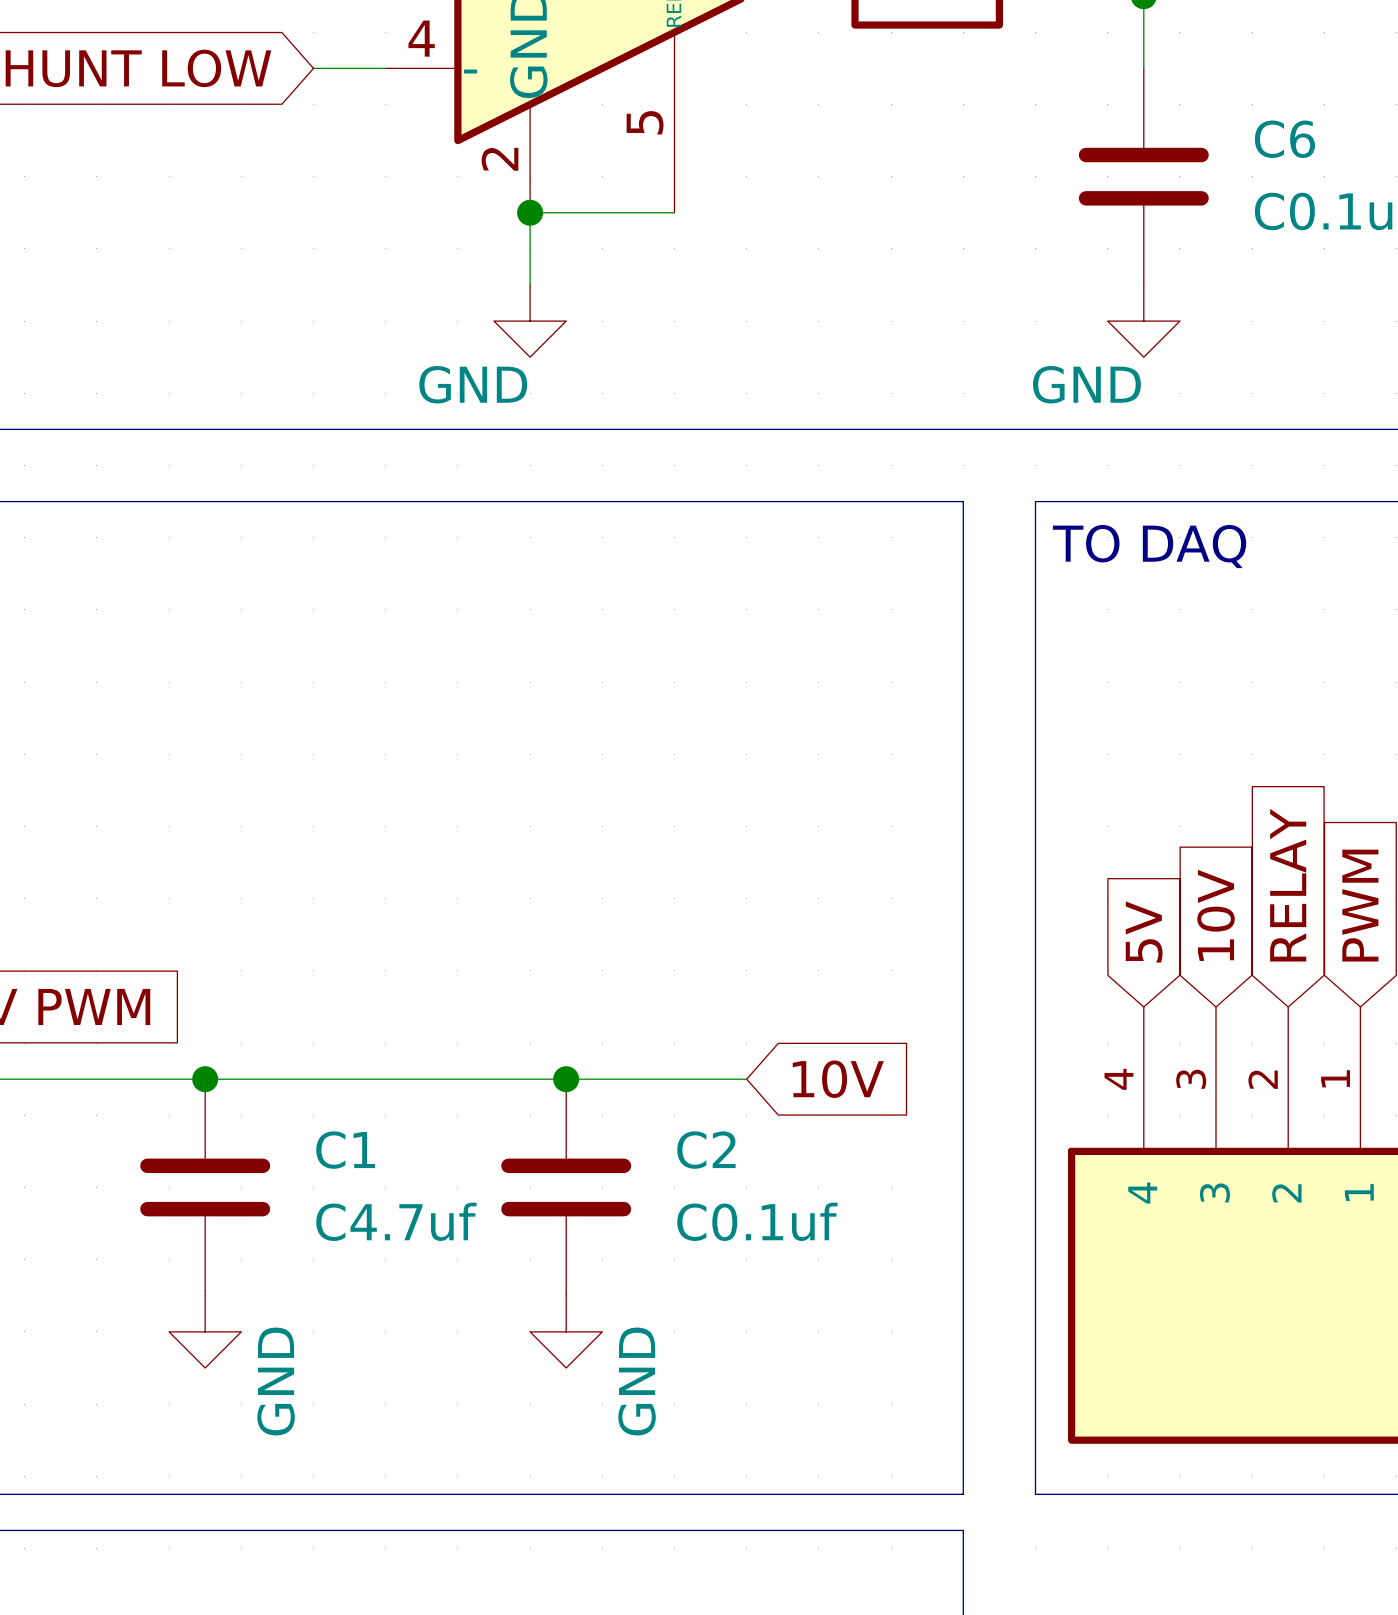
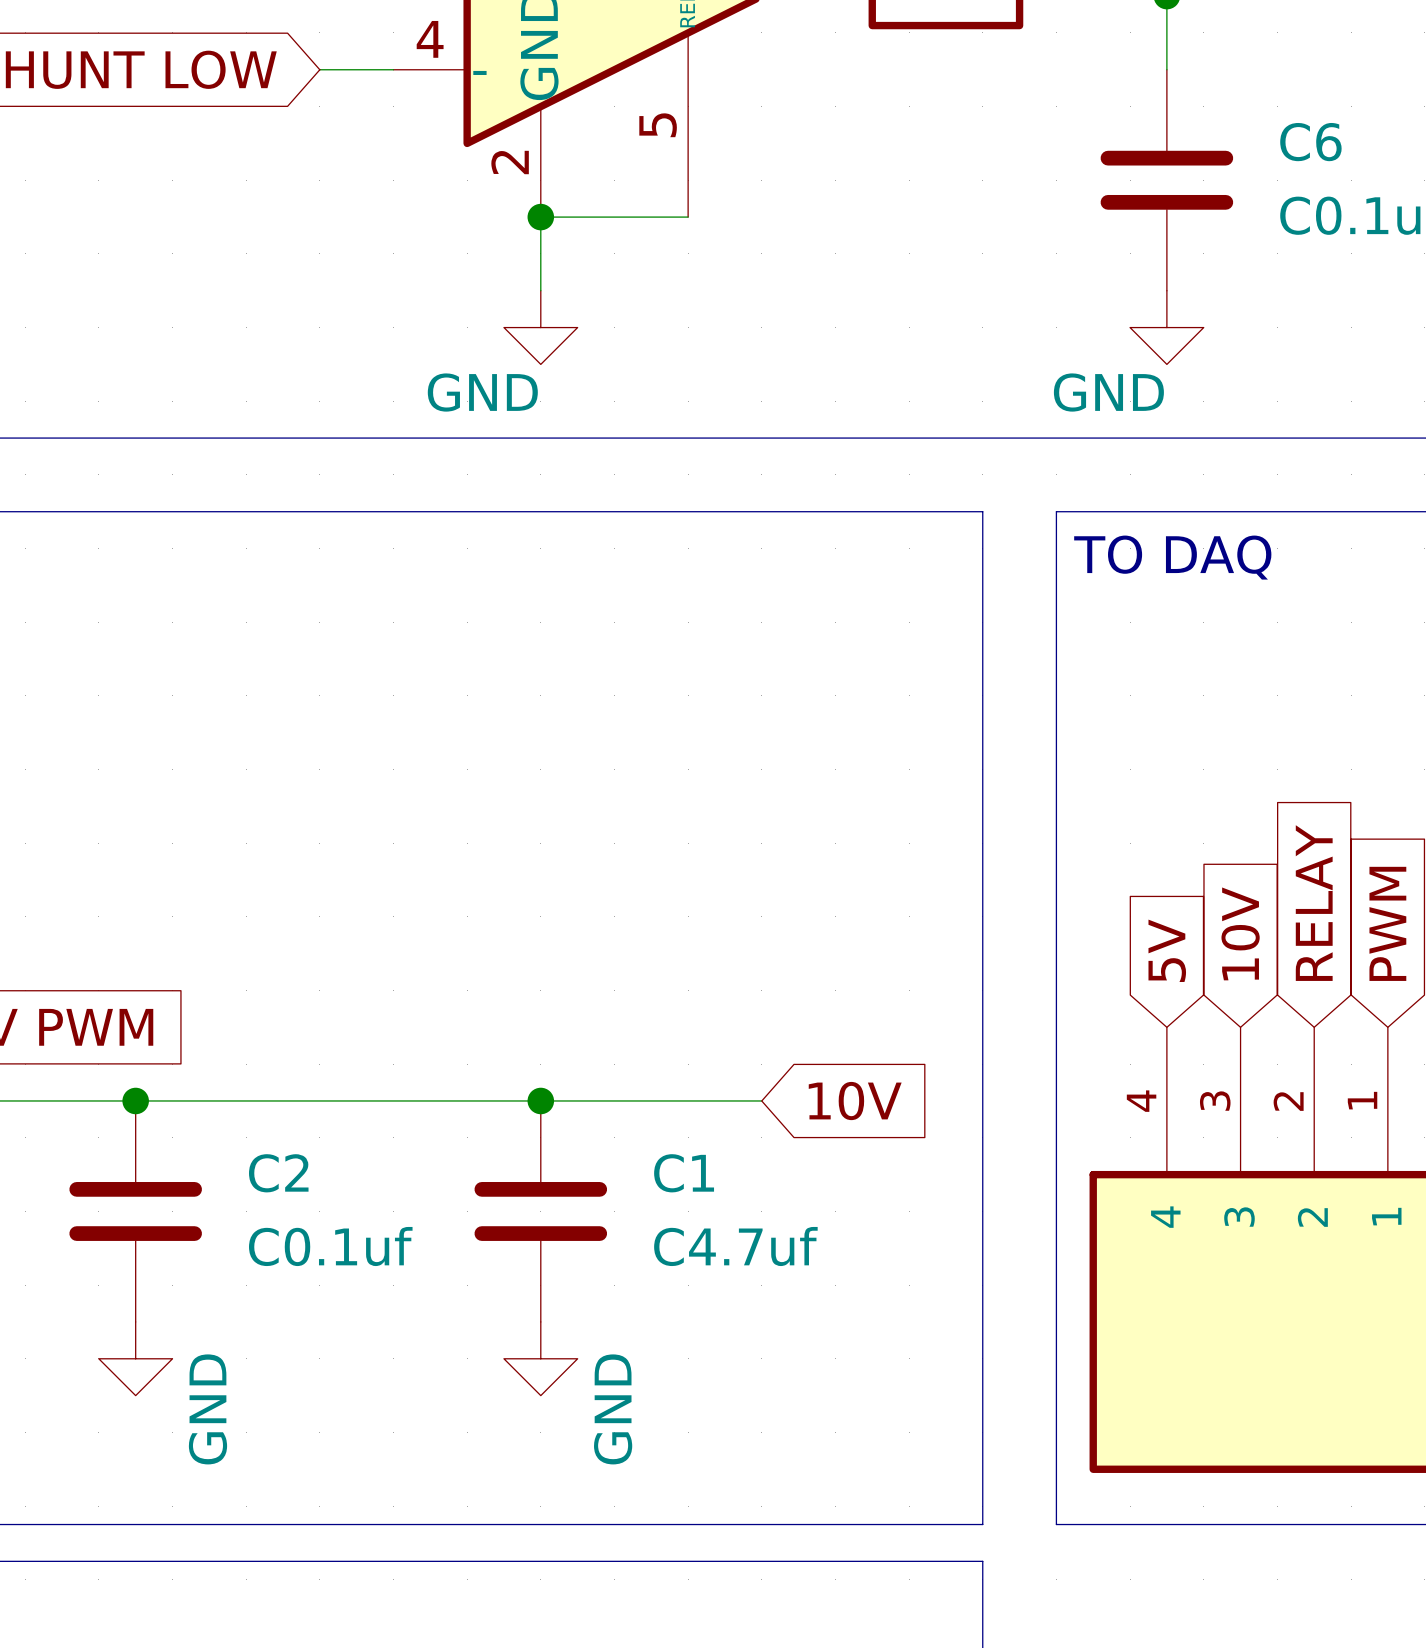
junction position: (205, 1079) -> (135, 1100)
junction position: (566, 1079) -> (540, 1100)
C1 position: (205, 1187) -> (540, 1211)
C2 position: (566, 1187) -> (135, 1211)
power symbol position: GND (205, 1331) -> GND (135, 1358)
power symbol position: GND (566, 1331) -> GND (540, 1358)

